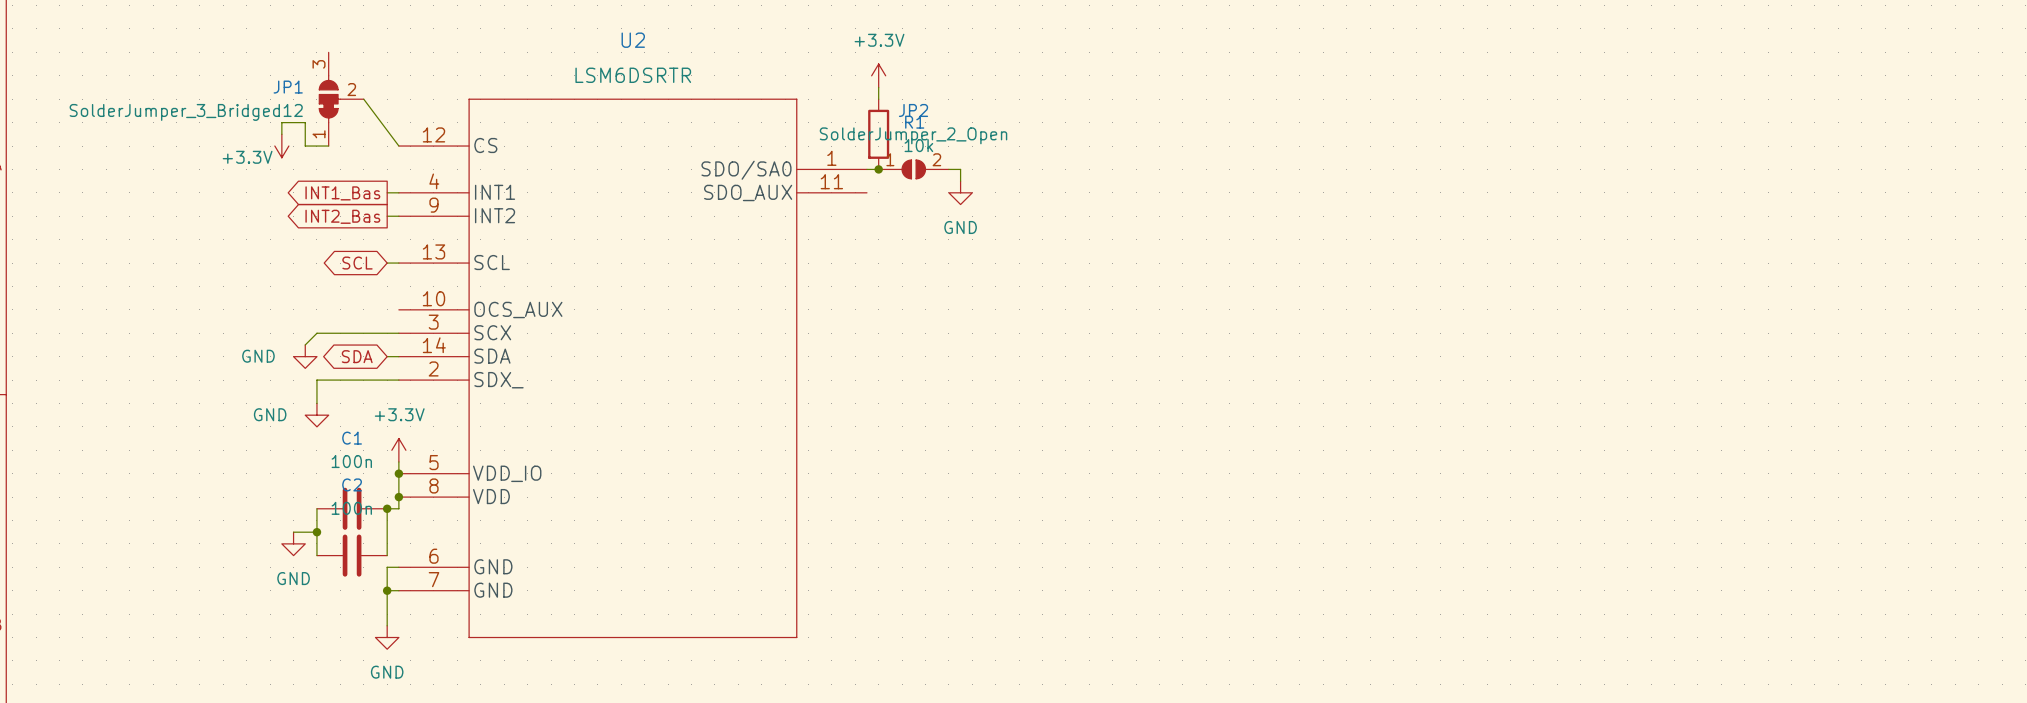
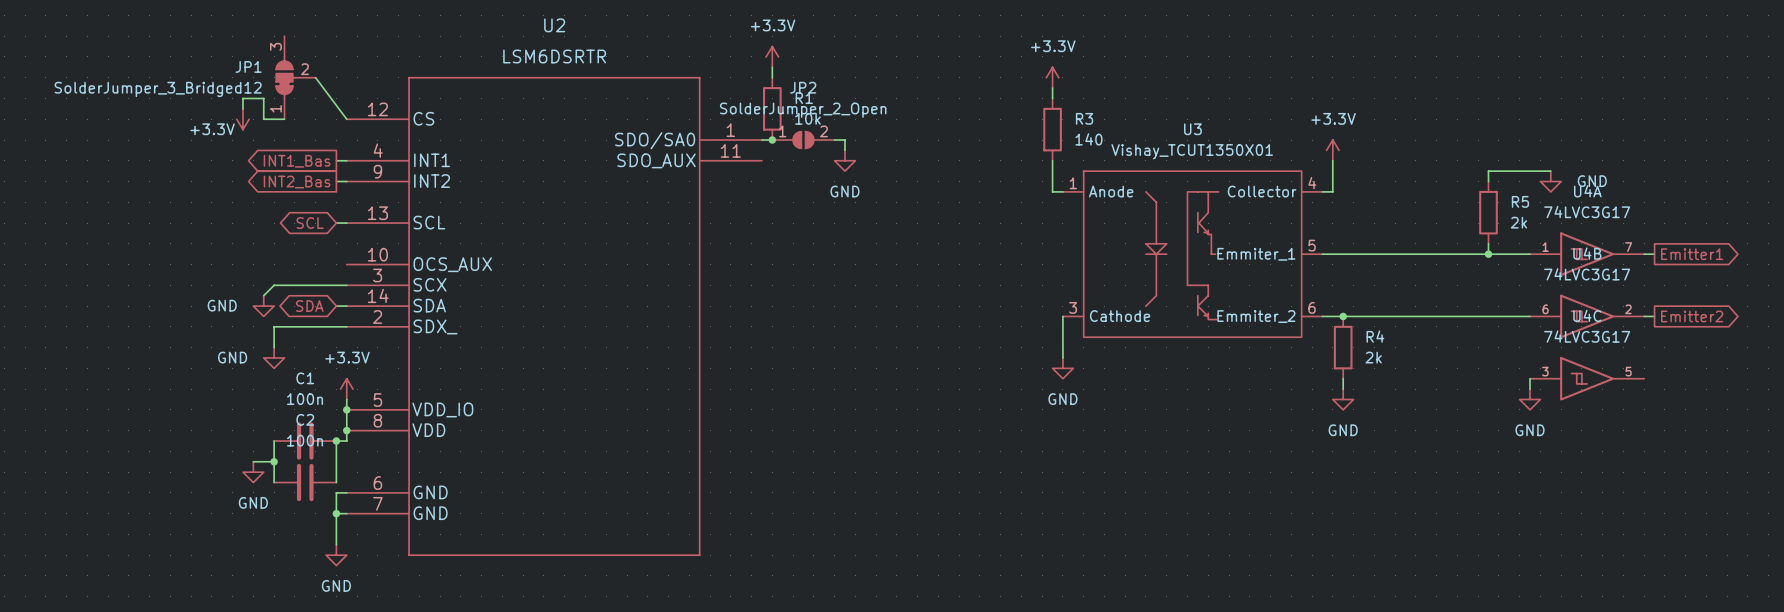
power symbol: none -> +3.3V (1052, 77)
wire: none -> (1052, 88) (1052, 98)
R3: none -> 140 (1052, 129)
power symbol: none -> +3.3V (1332, 150)
wire: none -> (1052, 160) (1052, 191) (1062, 191)
wire: none -> (1332, 160) (1332, 191) (1322, 191)
wire: none -> (1550, 171) (1488, 171) (1488, 181)
power symbol: none -> GND (1550, 181)
R5: none -> 2k (1488, 212)
wire: none -> (1488, 243) (1488, 254)
U3: none -> Vishay_TCUT1350X01 (1192, 254)
wire: none -> (1322, 254) (1530, 254)
junction: none -> (1488, 254)
U4A: none -> 74LVC3G17 (1587, 254)
wire: none -> (1644, 254) (1654, 254)
global label: none -> Emitter1 (1692, 254)
wire: none -> (1062, 316) (1062, 357)
wire: none -> (1322, 316) (1530, 316)
junction: none -> (1343, 316)
U4B: none -> 74LVC3G17 (1587, 316)
wire: none -> (1644, 316) (1654, 316)
global label: none -> Emitter2 (1692, 316)
R4: none -> 2k (1343, 347)
power symbol: none -> GND (1062, 368)
wire: none -> (1343, 378) (1343, 389)
wire: none -> (1530, 378) (1530, 389)
U4C: none -> 74LVC3G17 (1587, 378)
power symbol: none -> GND (1343, 399)
power symbol: none -> GND (1530, 399)

